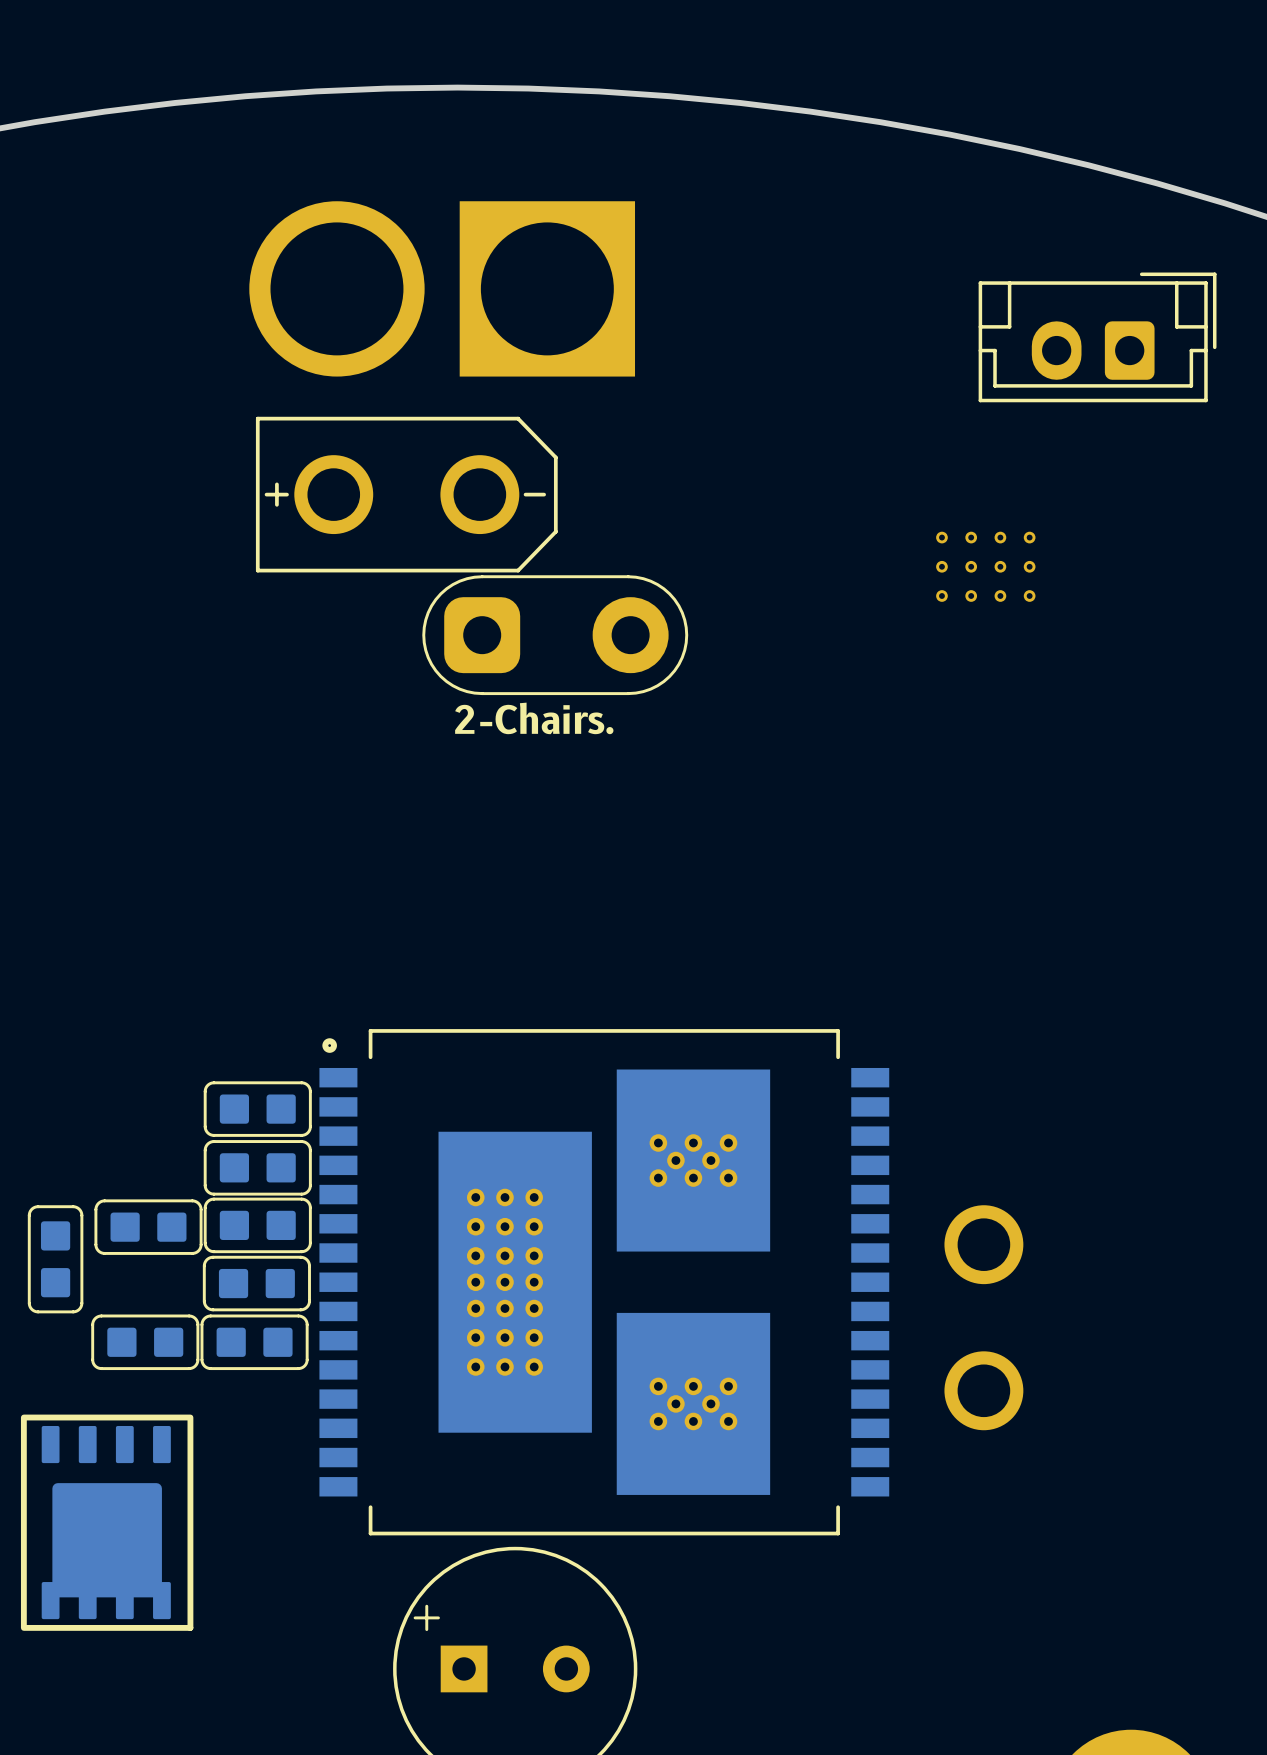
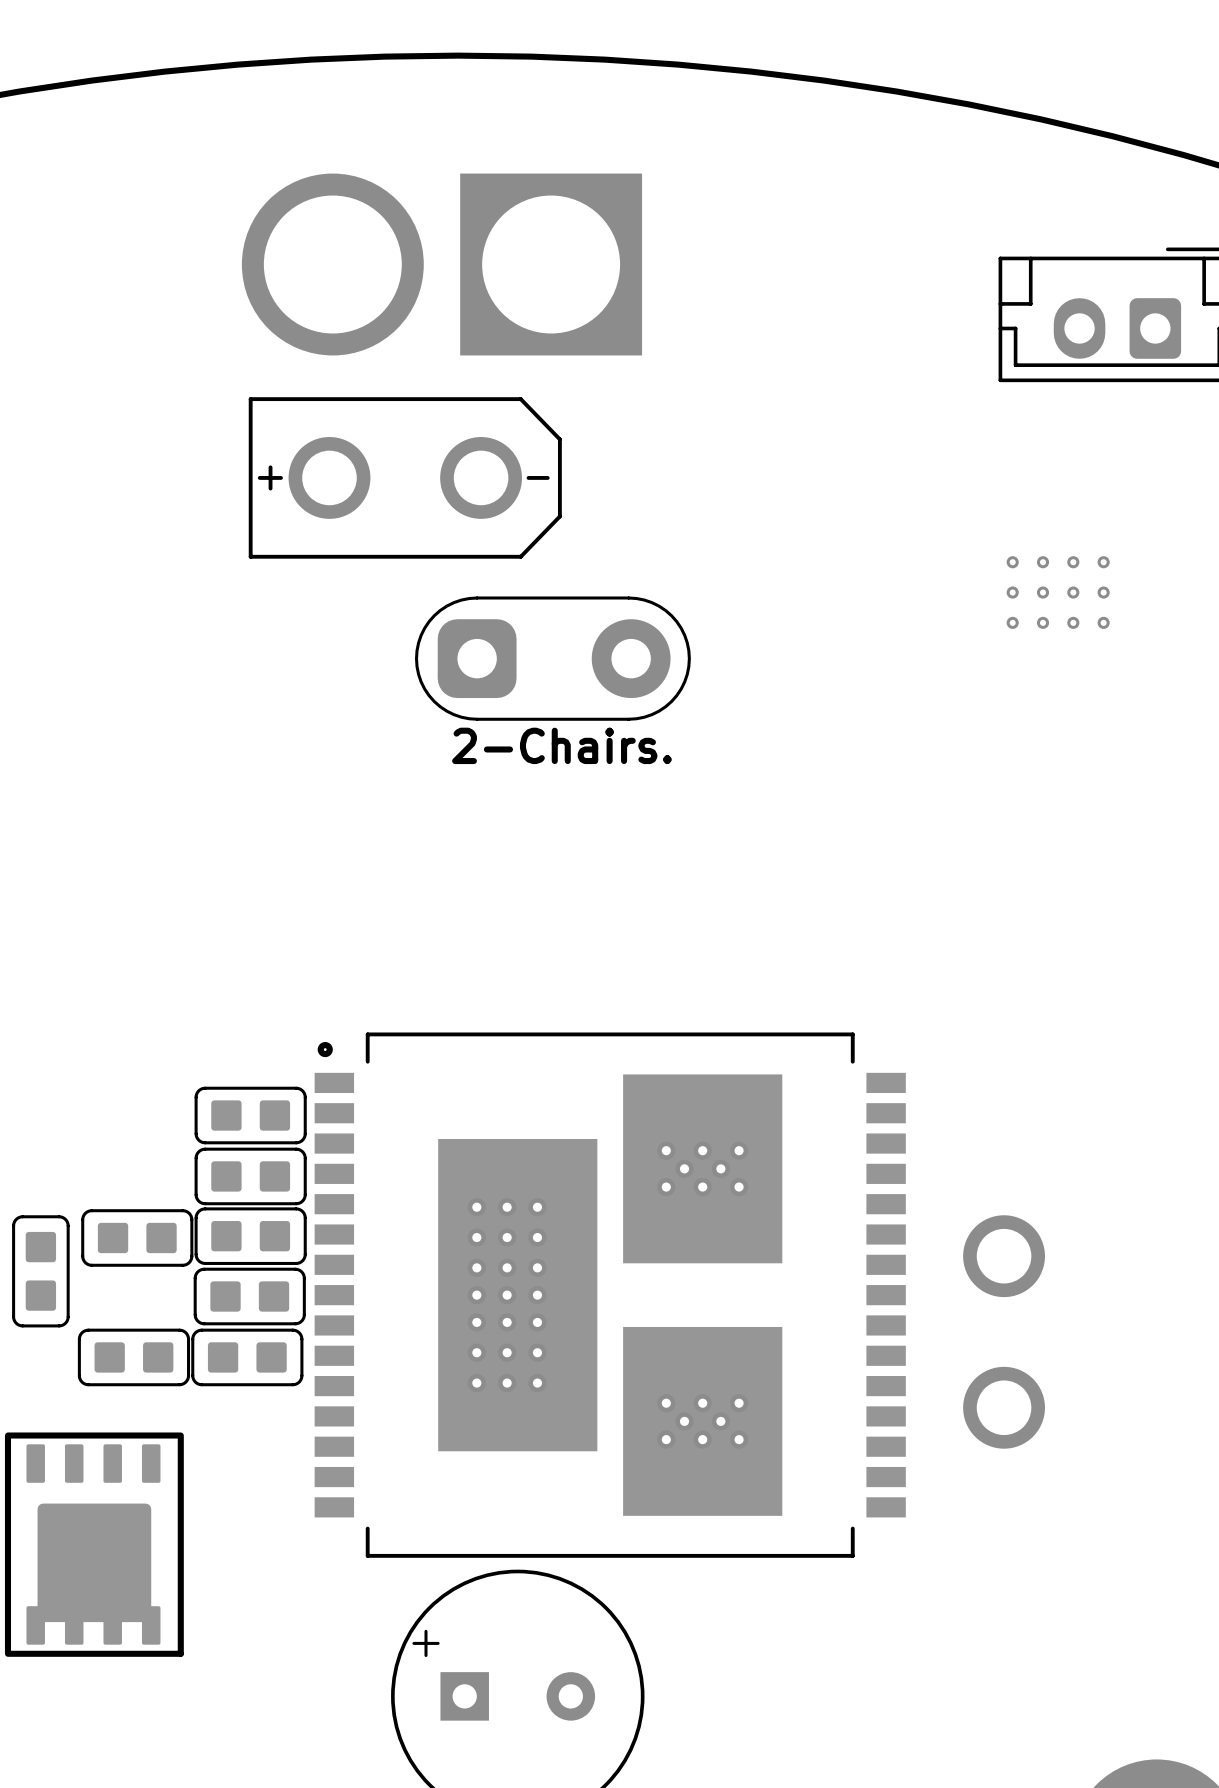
part position: (985, 566) -> (1058, 592)
part position: (555, 635) -> (552, 658)

